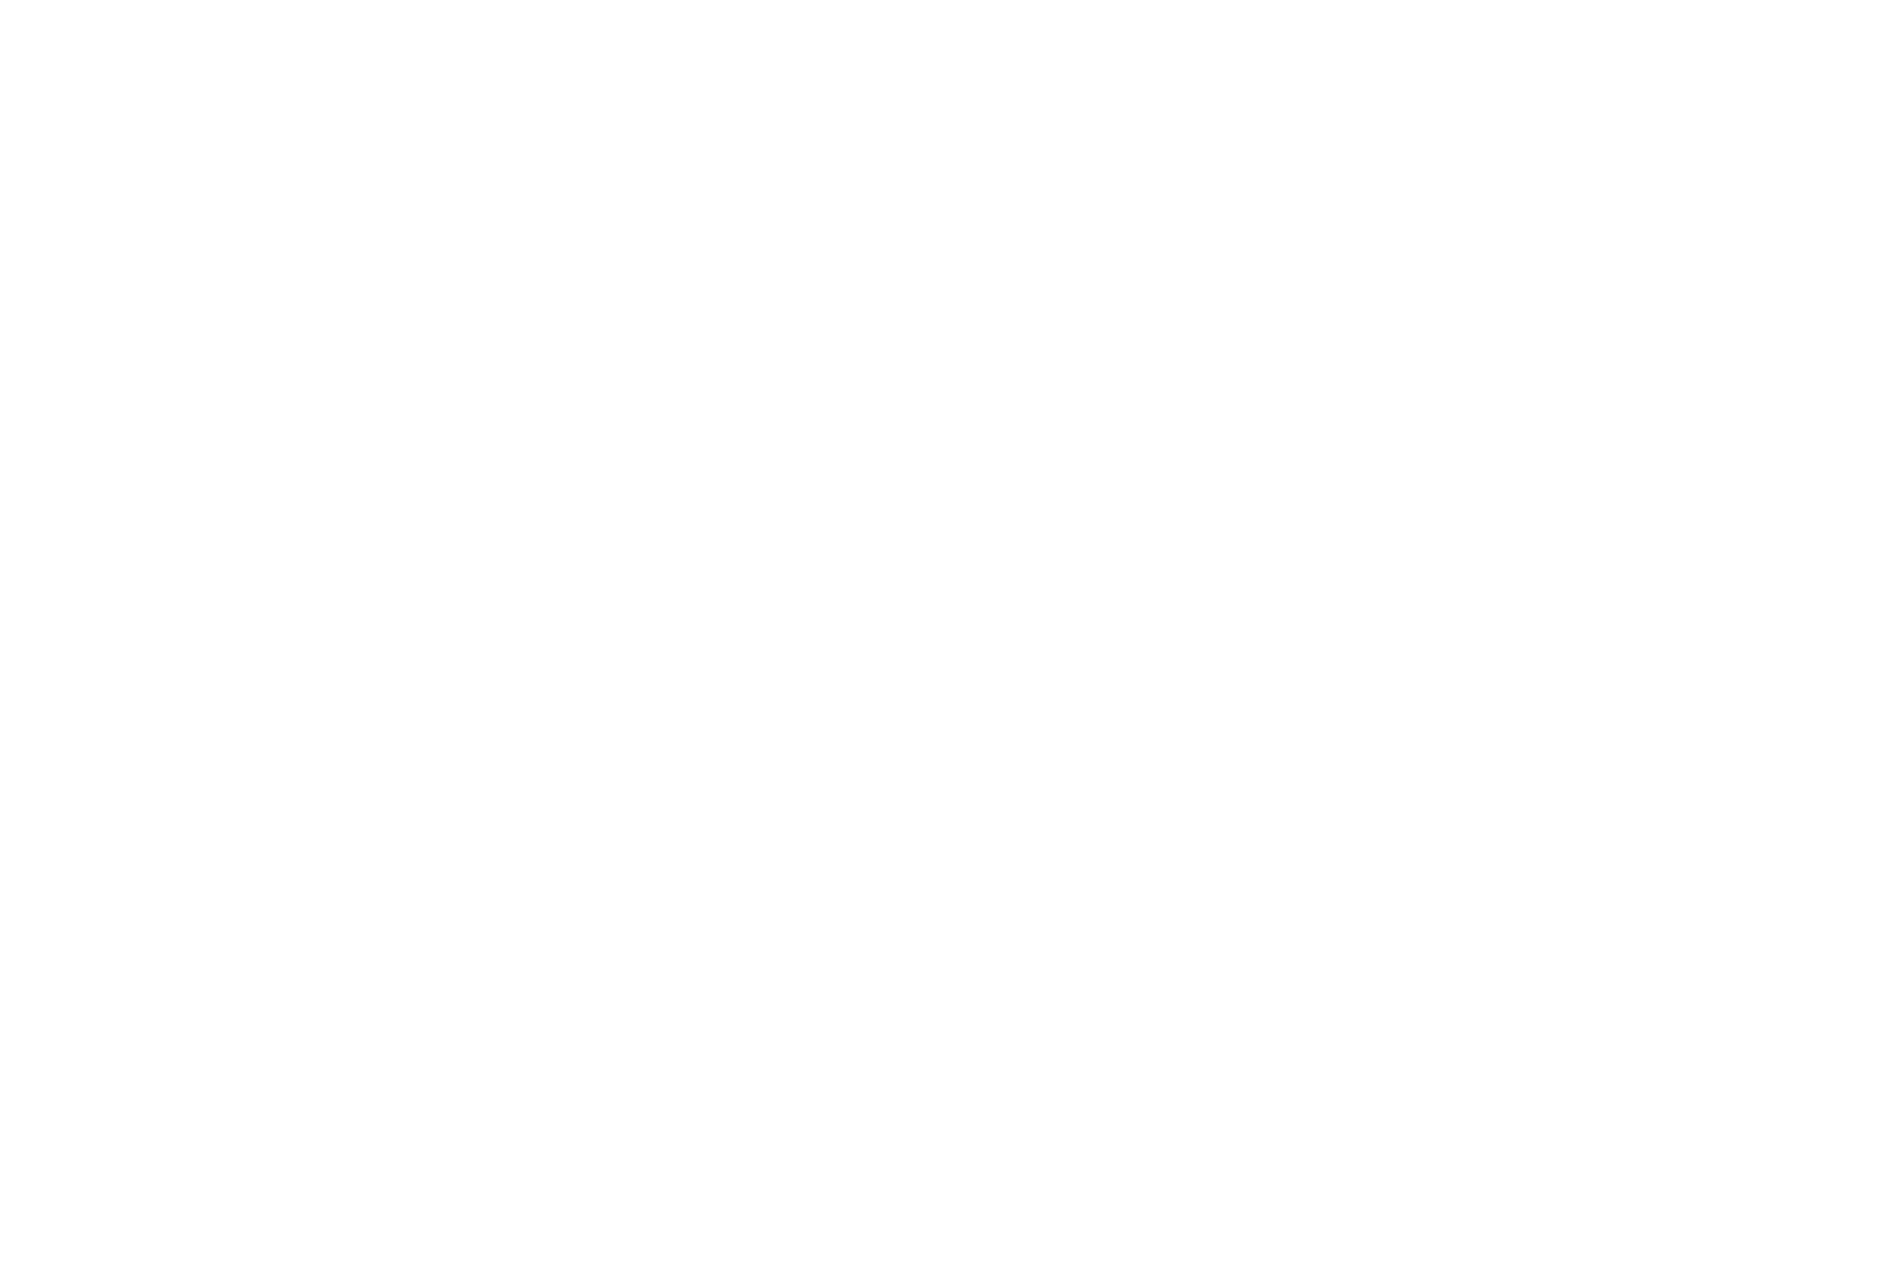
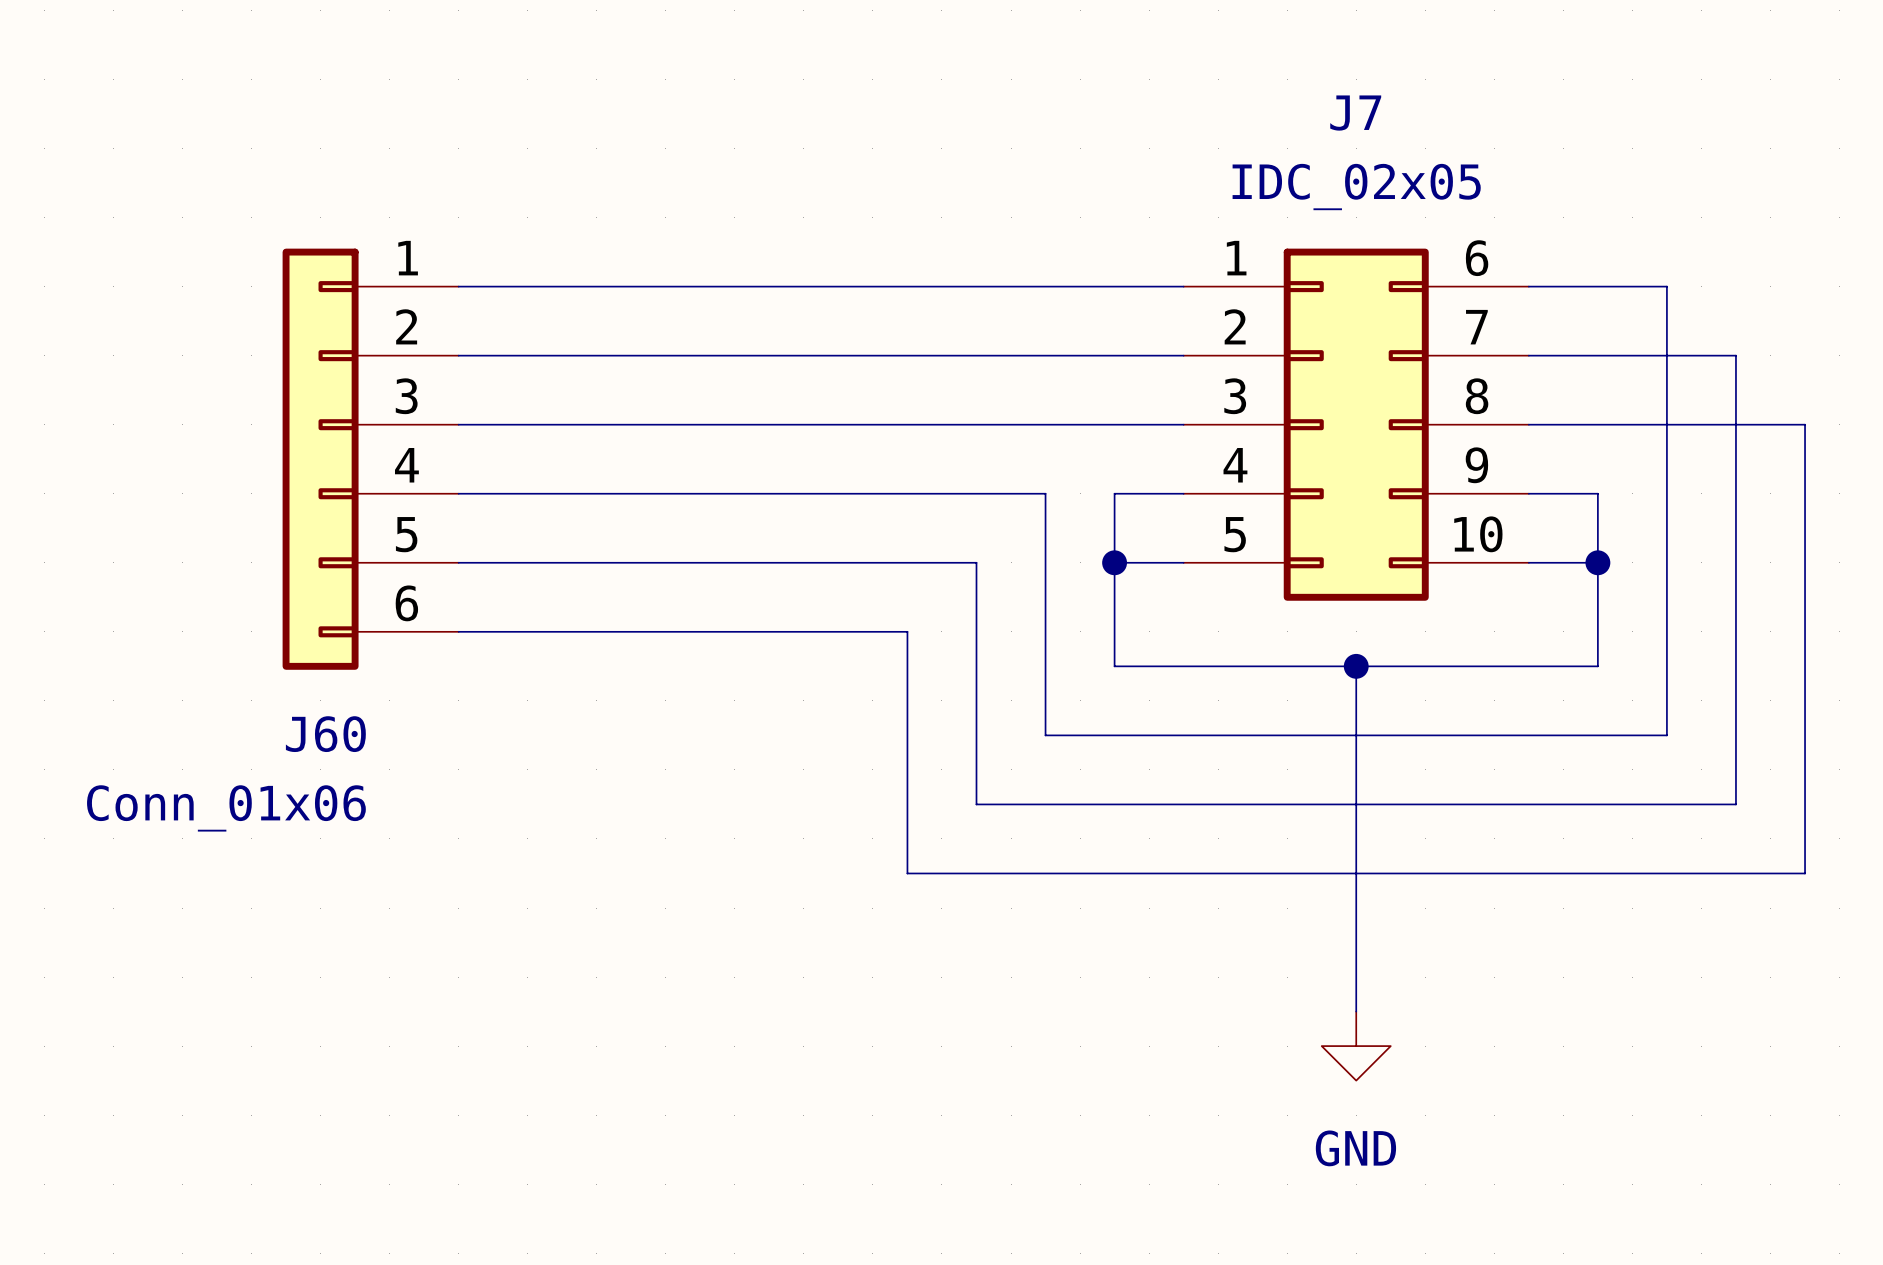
wire: none -> (458, 286) (1183, 286)
wire: none -> (1528, 286) (1666, 286) (1666, 735) (1045, 735) (1045, 493) (458, 493)
wire: none -> (458, 355) (1183, 355)
wire: none -> (1528, 355) (1735, 355) (1735, 804) (976, 804) (976, 562) (458, 562)
wire: none -> (458, 424) (1183, 424)
J7: none -> IDC_02x05 (1356, 424)
wire: none -> (1528, 424) (1805, 424) (1805, 873) (907, 873) (907, 631) (458, 631)
J60: none -> Conn_01x06 (370, 459)
wire: none -> (1183, 493) (1114, 493) (1114, 666) (1597, 666) (1597, 493) (1528, 493)
wire: none -> (1114, 562) (1183, 562)
junction: none -> (1114, 562)
wire: none -> (1528, 562) (1597, 562)
junction: none -> (1597, 562)
wire: none -> (1356, 666) (1356, 1011)
junction: none -> (1356, 666)
power symbol: none -> GND (1356, 1046)

